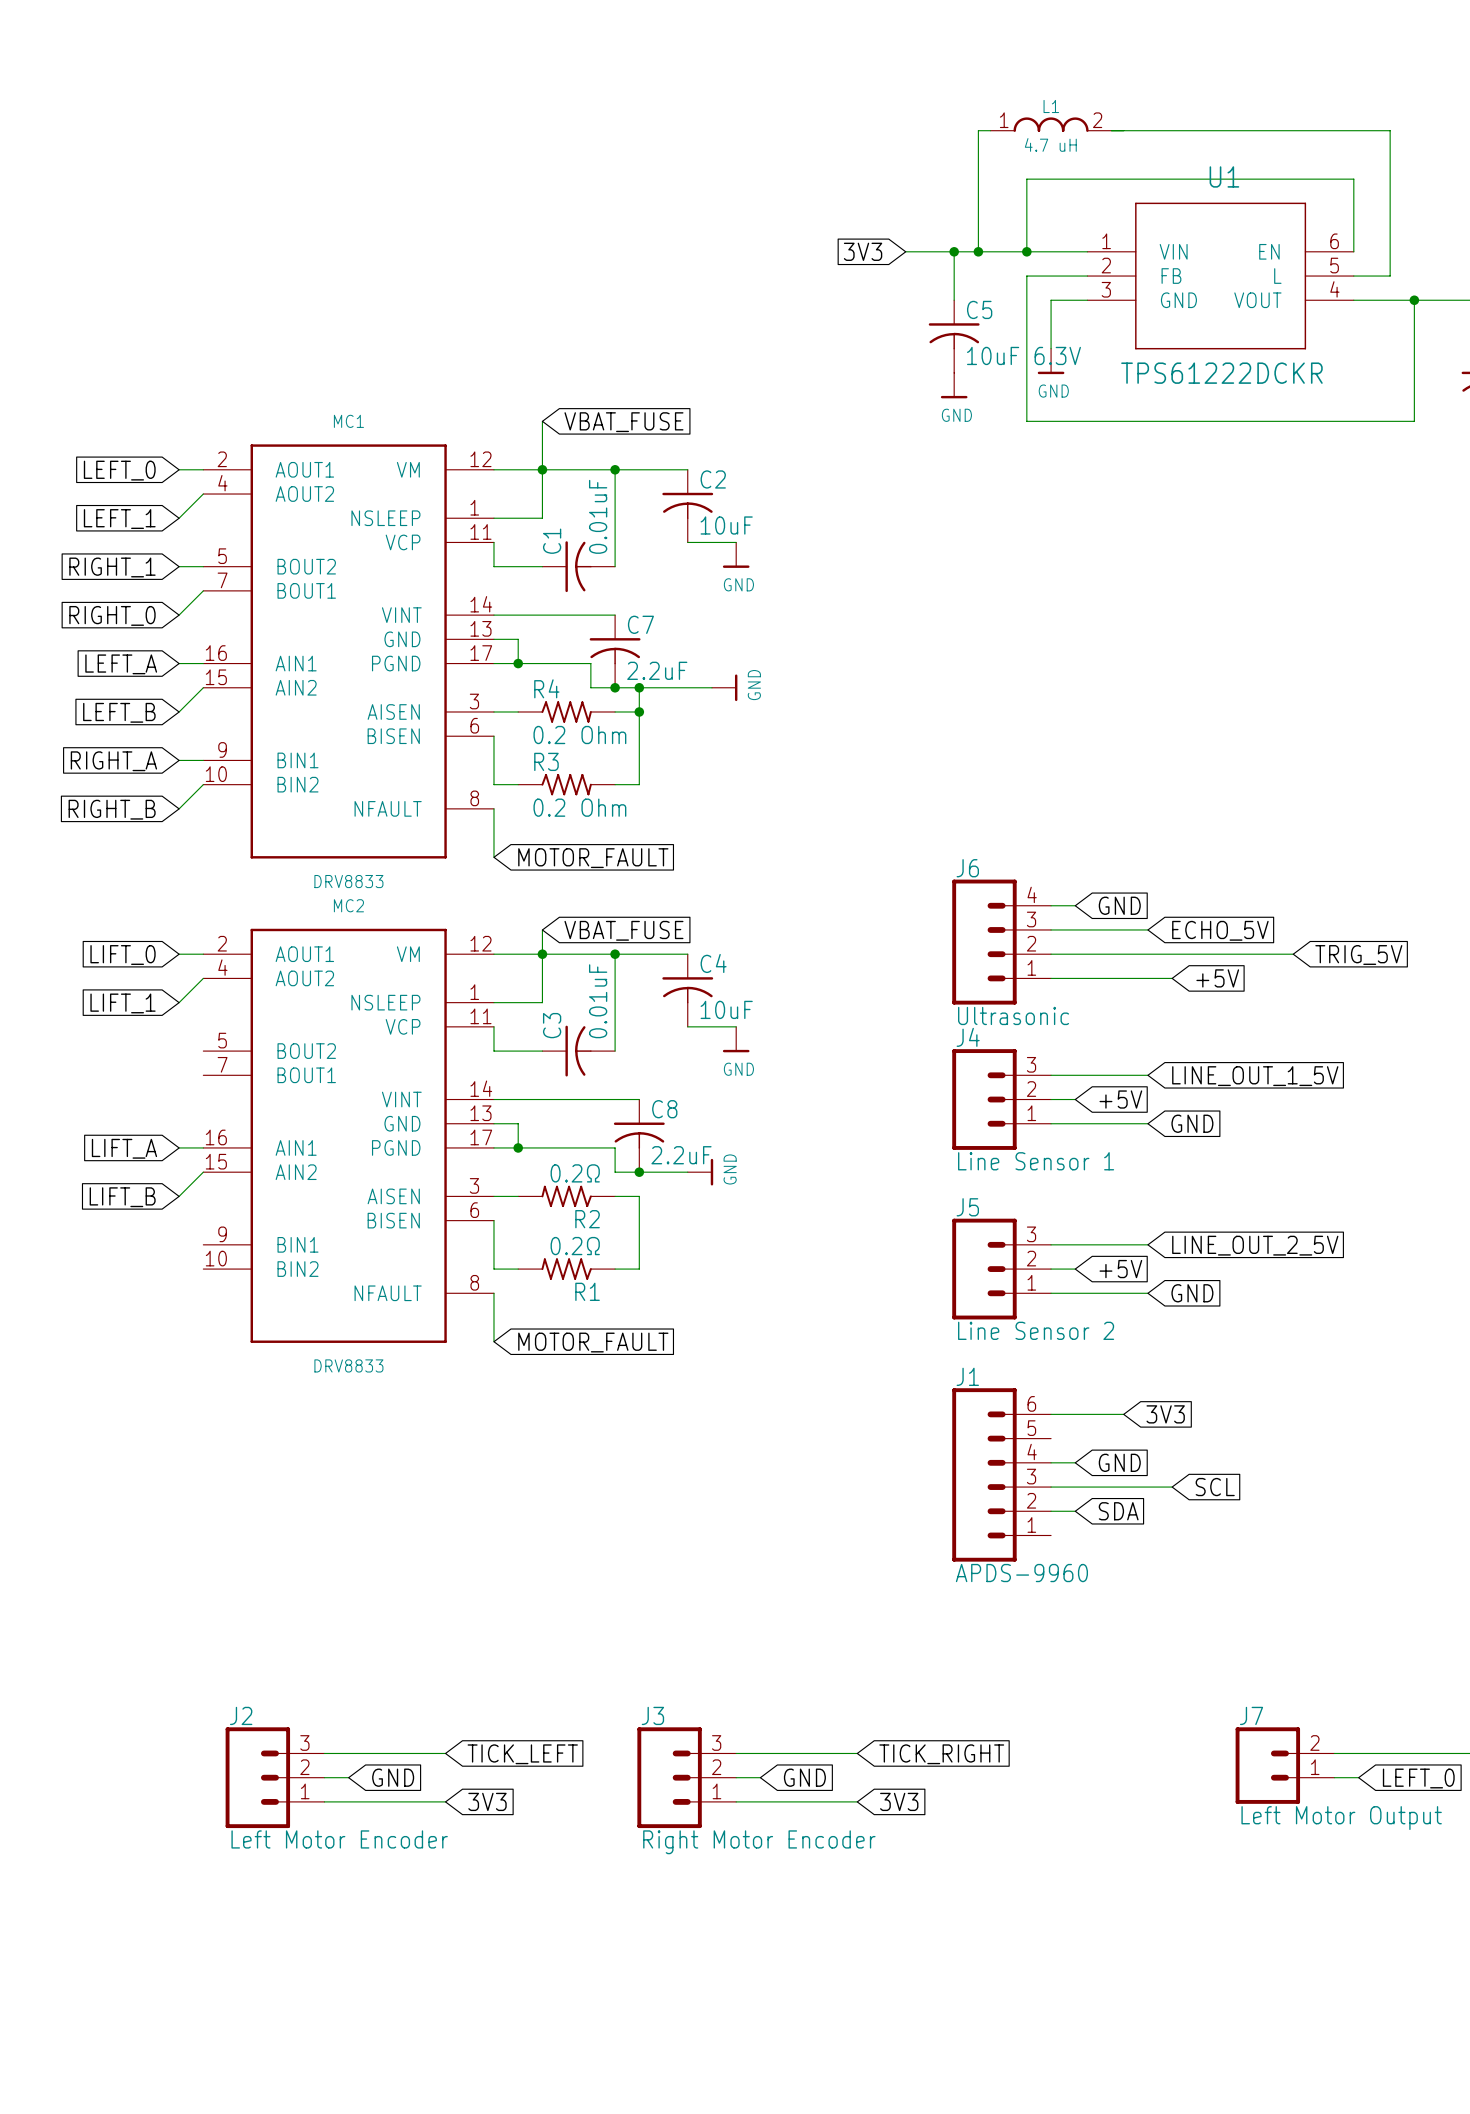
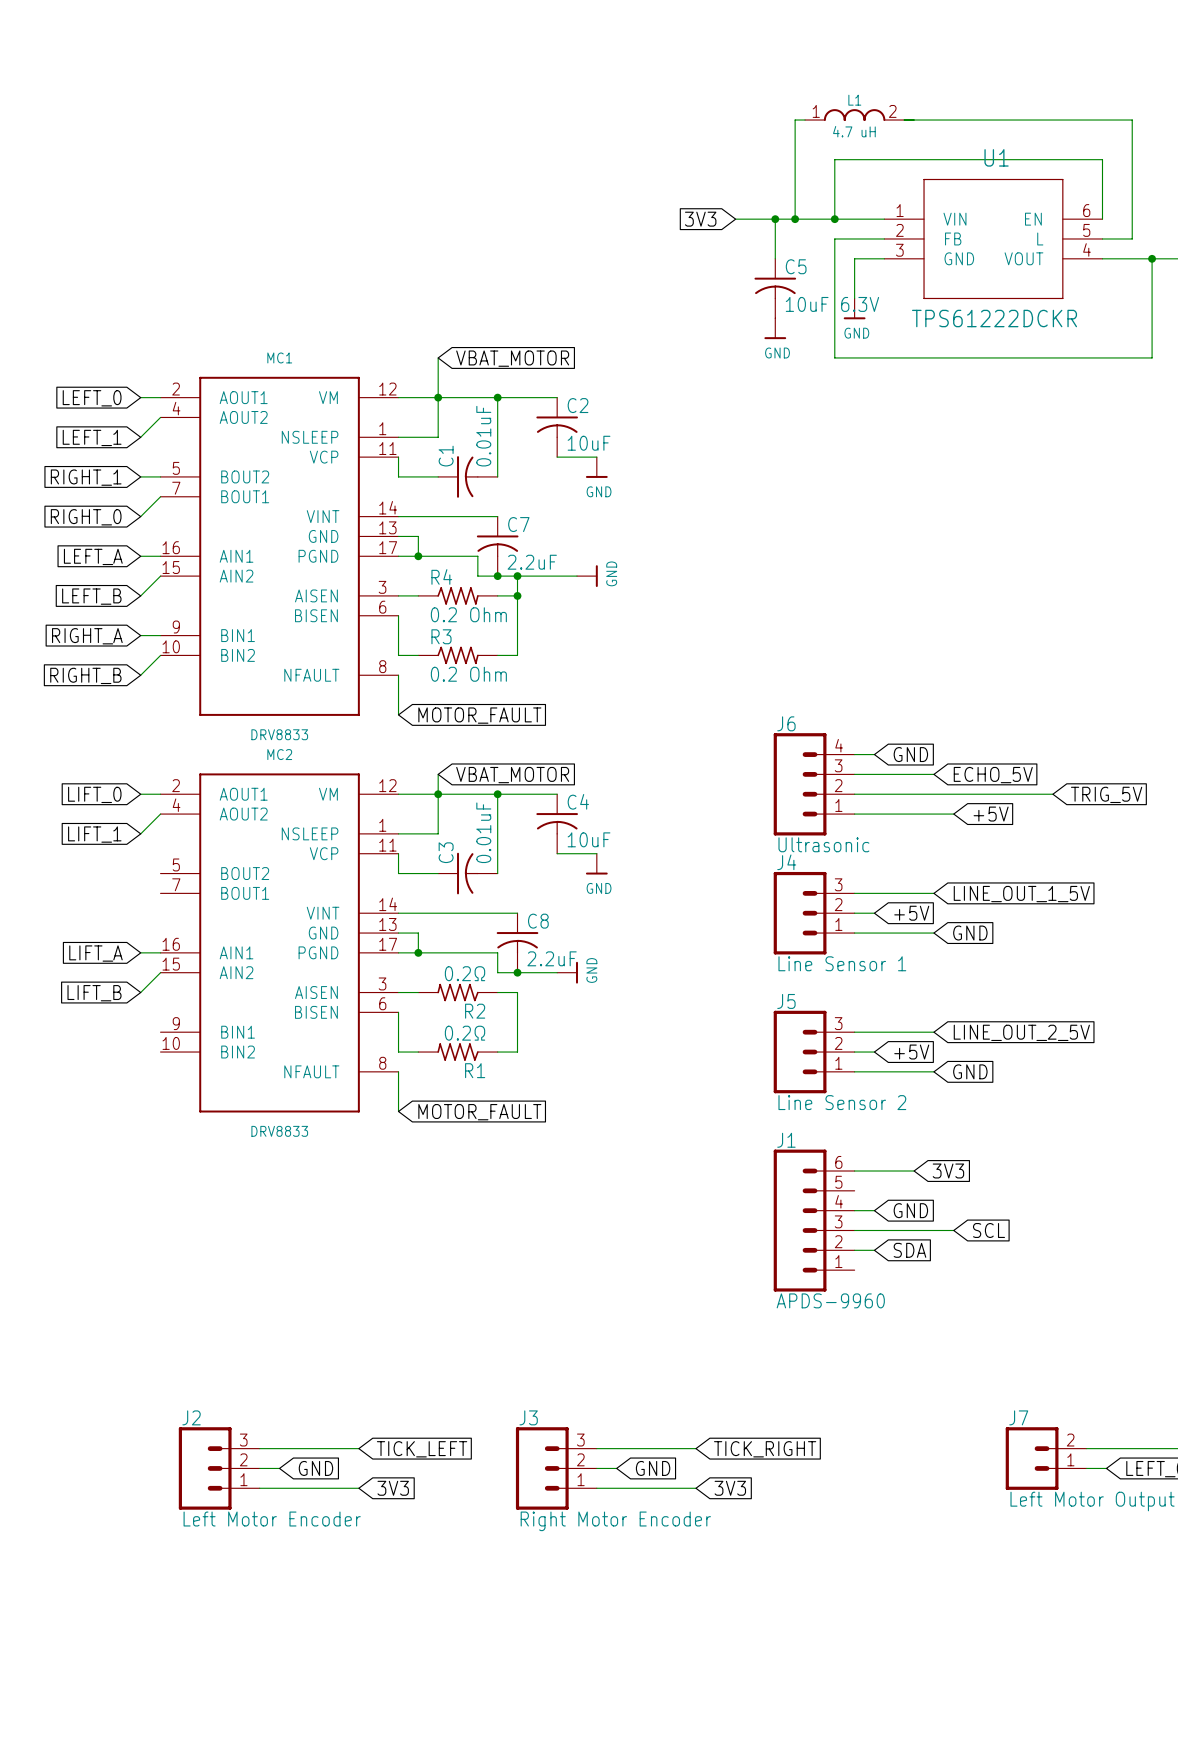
global label: VBAT_FUSE (623, 422) -> VBAT_MOTOR (512, 358)
global label: VBAT_FUSE (623, 930) -> VBAT_MOTOR (512, 775)

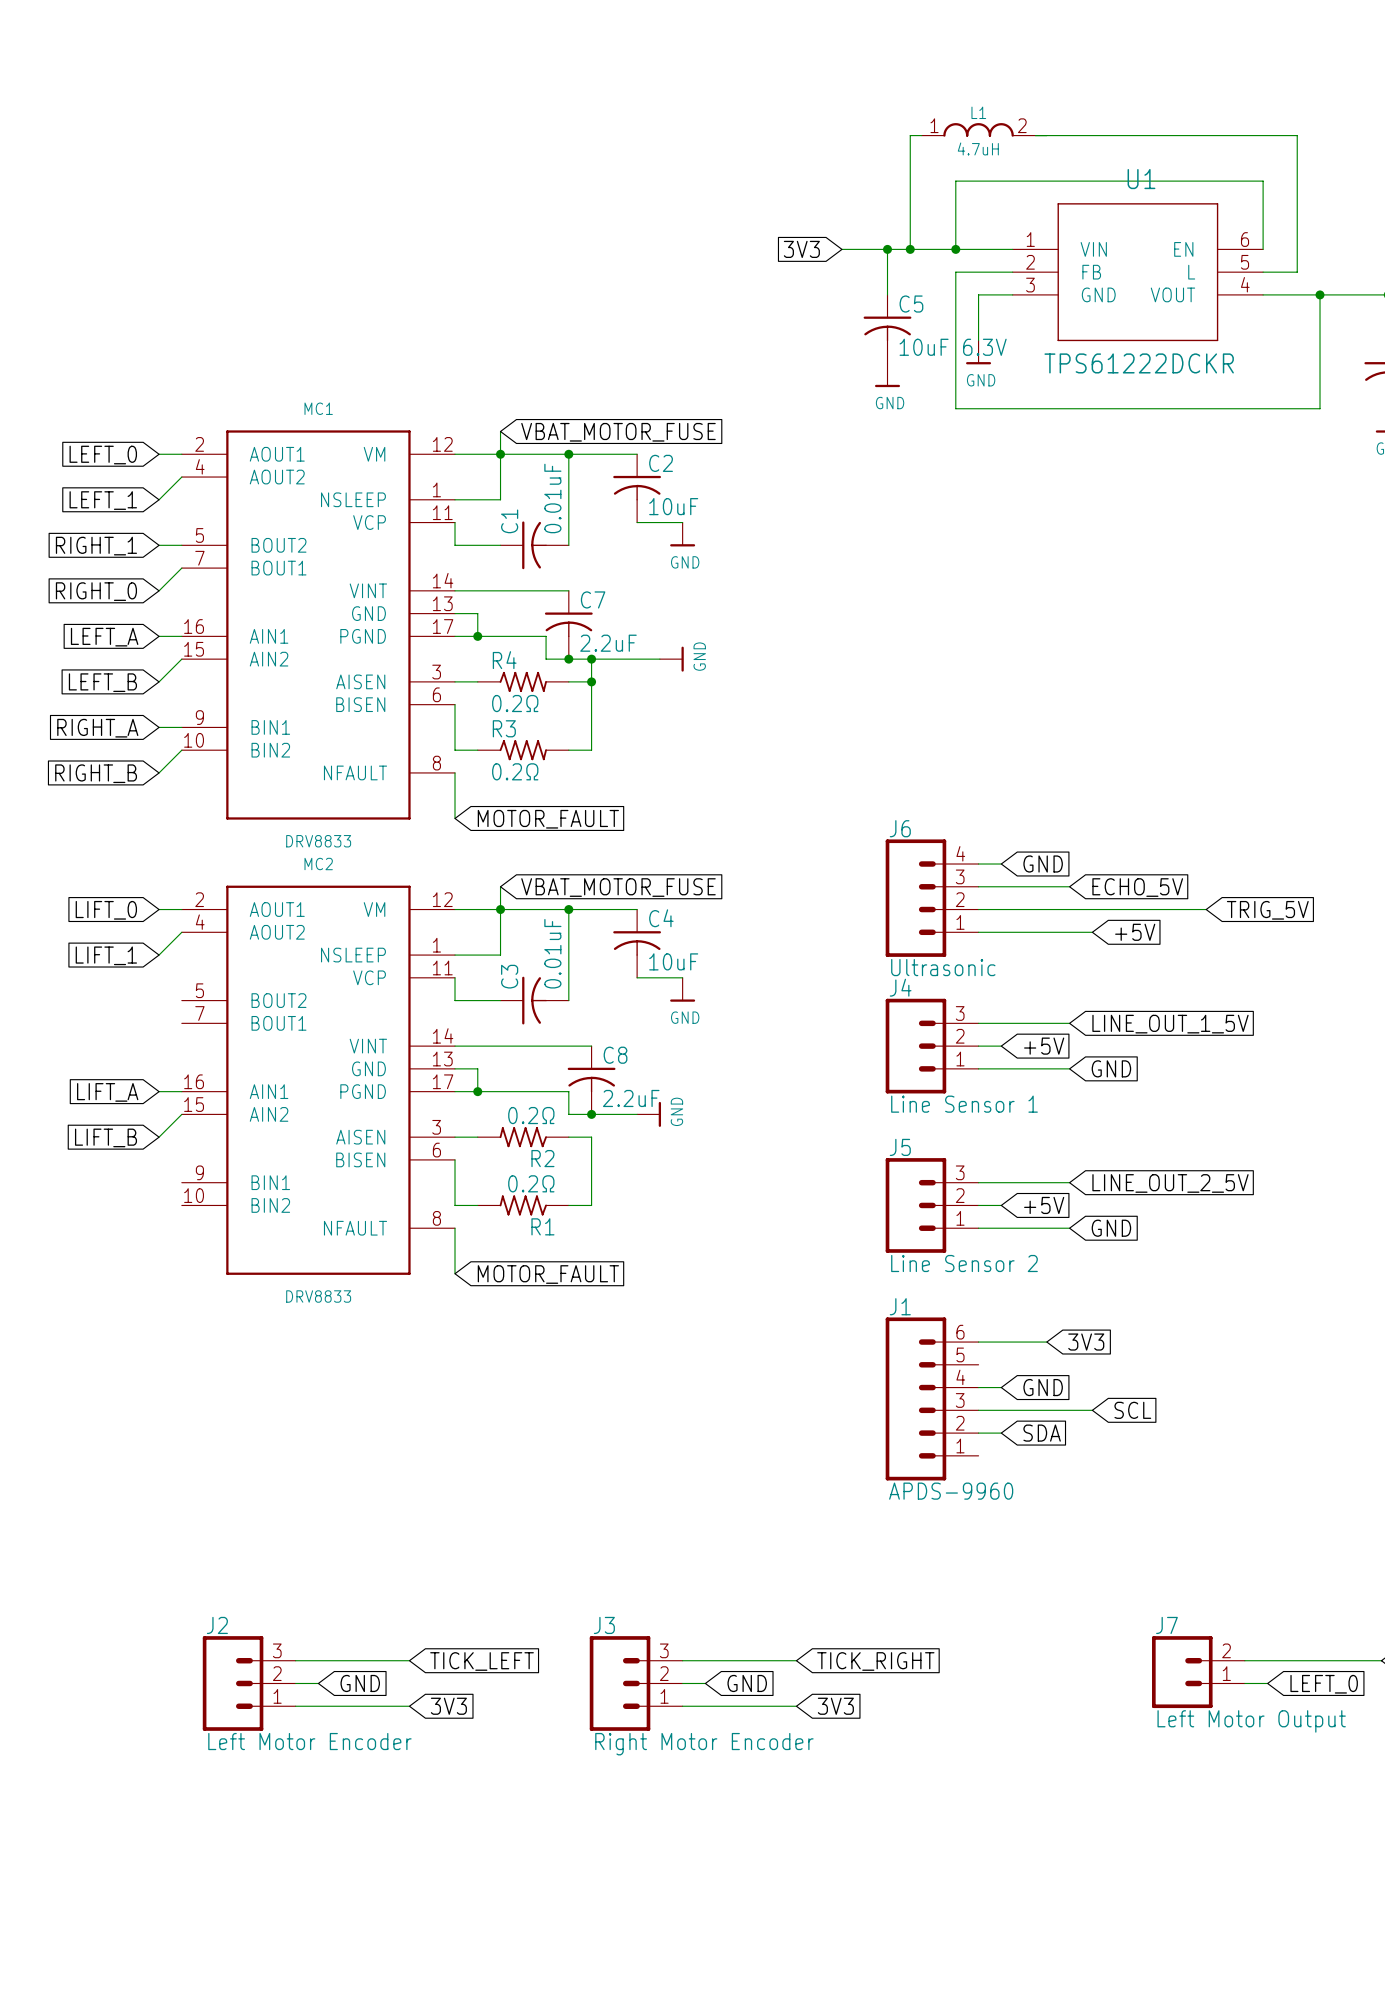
L1 value: 4.7 uH (854, 131) -> 4.7uH (978, 148)
wire: (438, 357) (438, 377) -> none
global label: VBAT_MOTOR (512, 358) -> VBAT_MOTOR_FUSE (618, 432)
R4 value: 0.2 Ohm (468, 614) -> 0.2Ω (515, 703)
R3 value: 0.2 Ohm (468, 674) -> 0.2Ω (515, 771)
global label: VBAT_MOTOR (512, 775) -> VBAT_MOTOR_FUSE (618, 887)

